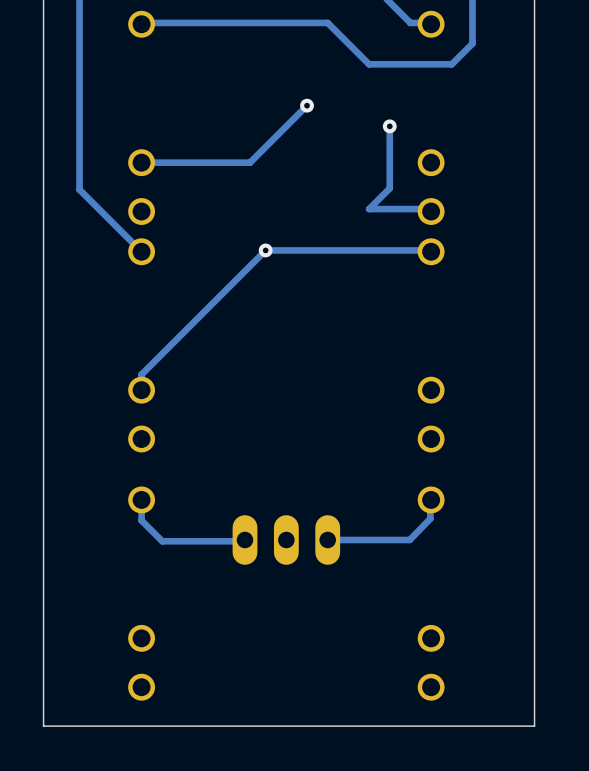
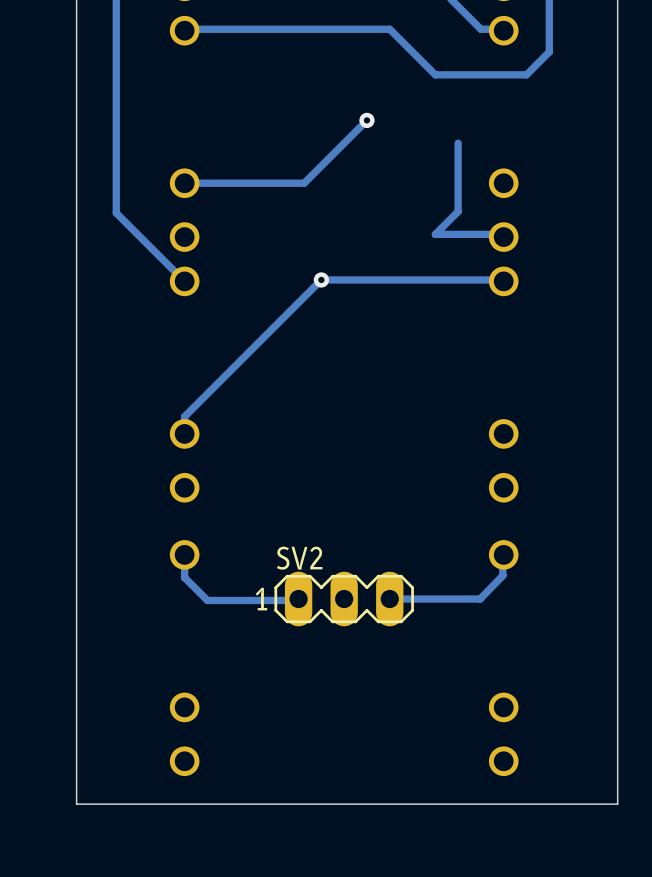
via: (389, 126) -> none
SV2 side: top (286, 539) -> bottom (344, 599)

